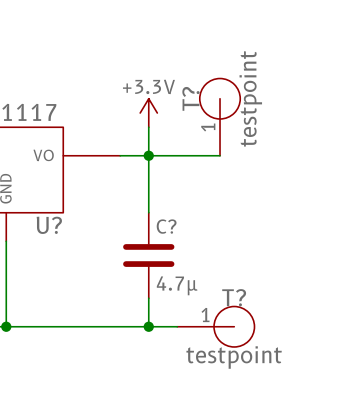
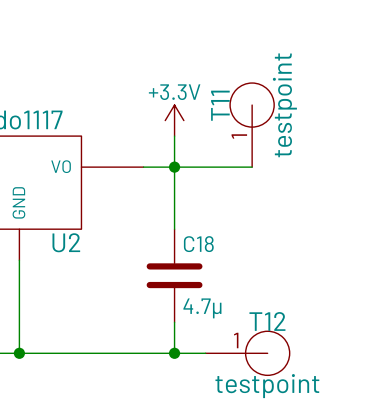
T? name: T? (190, 98) -> T11 (220, 105)
U? name: U? (49, 225) -> U2 (66, 242)
C? name: C? (166, 226) -> C18 (198, 244)
T? name: T? (234, 297) -> T12 (267, 321)

